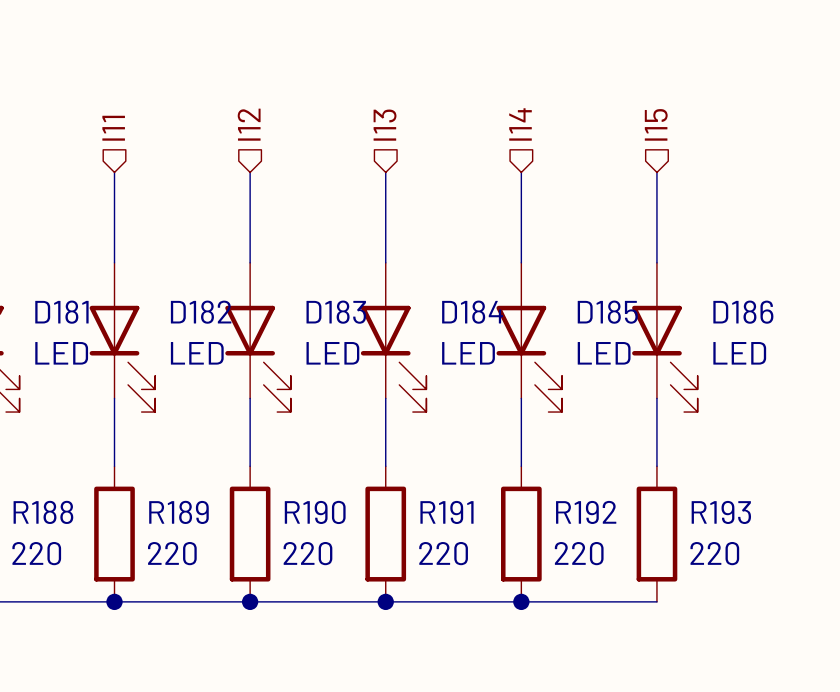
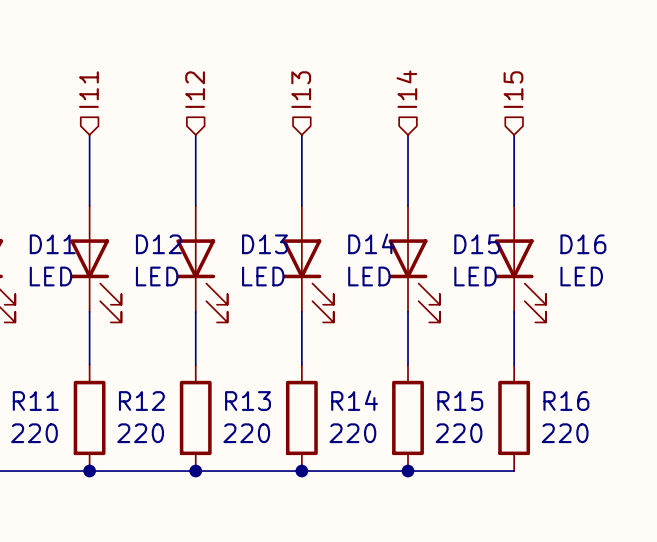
D181 name: D181 (61, 312) -> D11 (52, 244)
D182 name: D182 (201, 312) -> D12 (158, 244)
D183 name: D183 (336, 312) -> D13 (264, 244)
D184 name: D184 (472, 312) -> D14 (371, 243)
D185 name: D185 (607, 312) -> D15 (477, 244)
D186 name: D186 (743, 312) -> D16 (583, 244)
R188 name: R188 (43, 512) -> R11 (35, 401)
R189 name: R189 (178, 512) -> R12 (141, 401)
R190 name: R190 (315, 512) -> R13 (248, 401)
R191 name: R191 (446, 512) -> R14 (354, 400)
R192 name: R192 (586, 512) -> R15 (460, 401)
R193 name: R193 (721, 512) -> R16 (566, 401)

